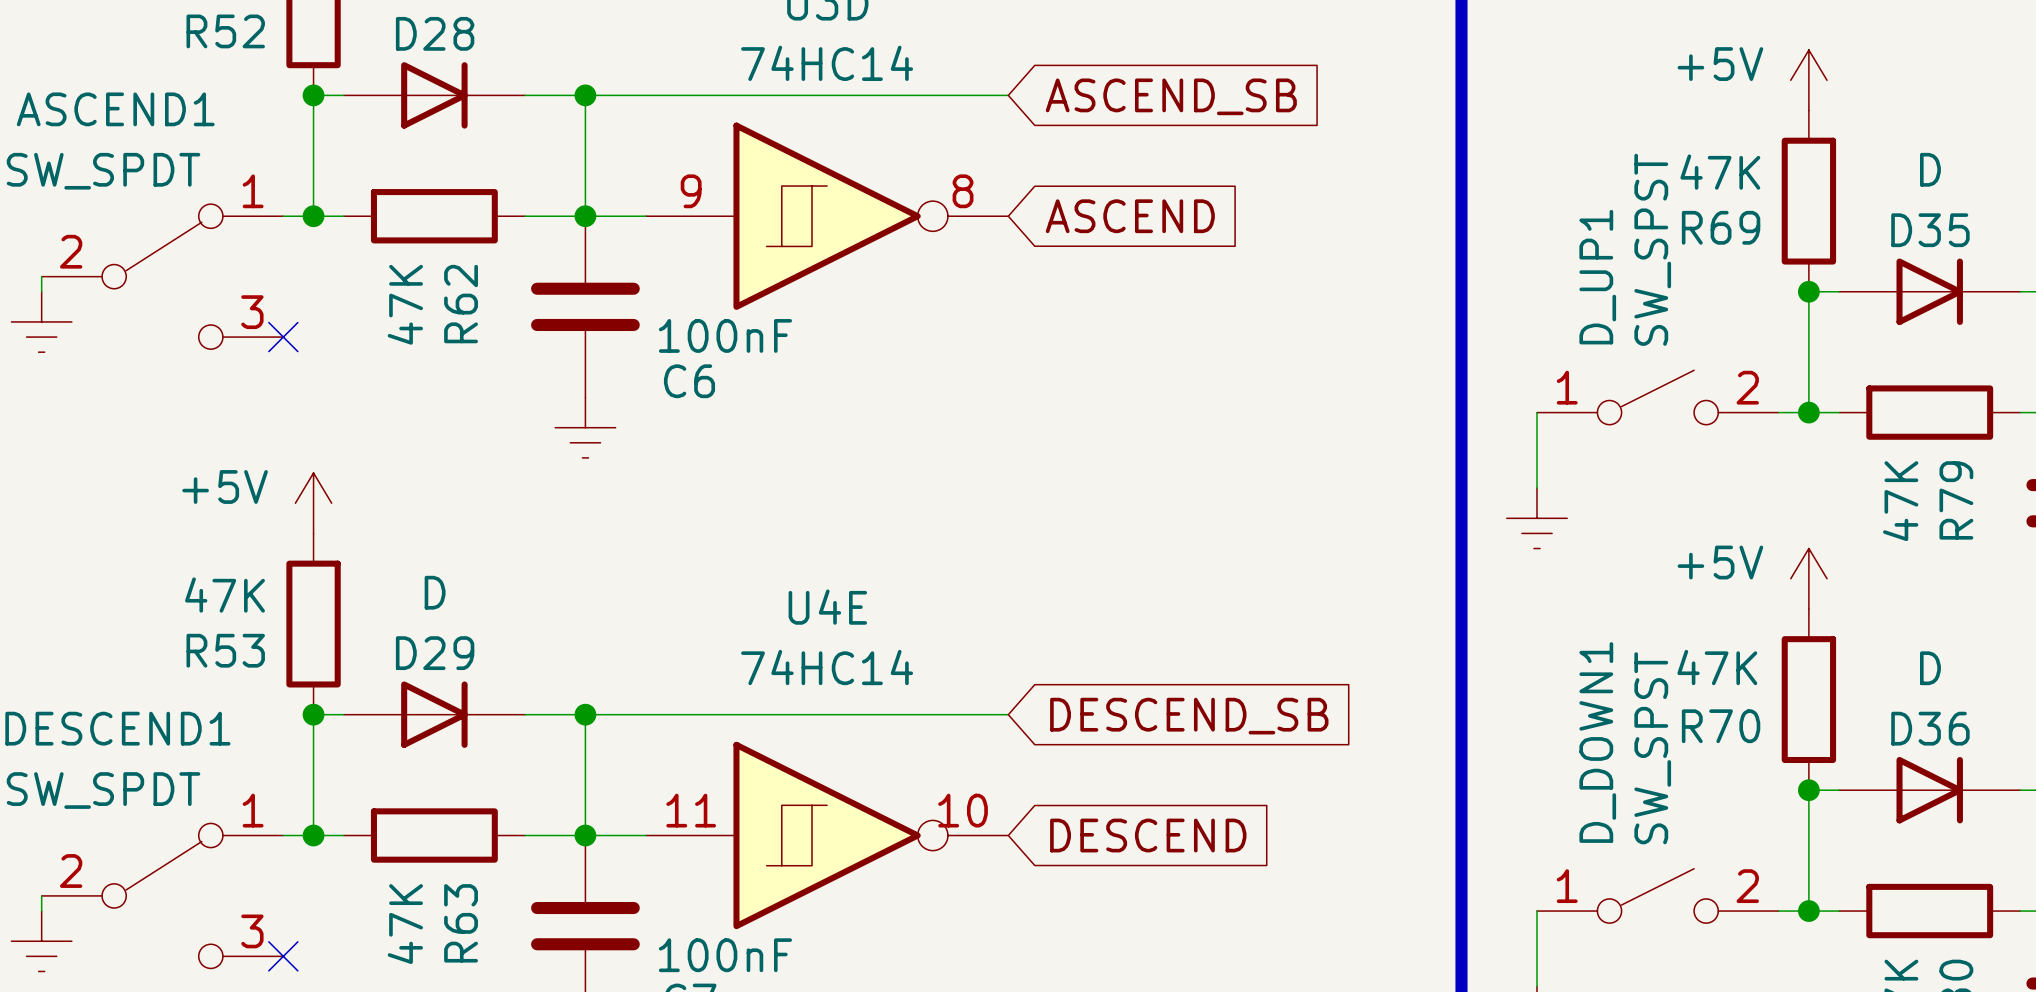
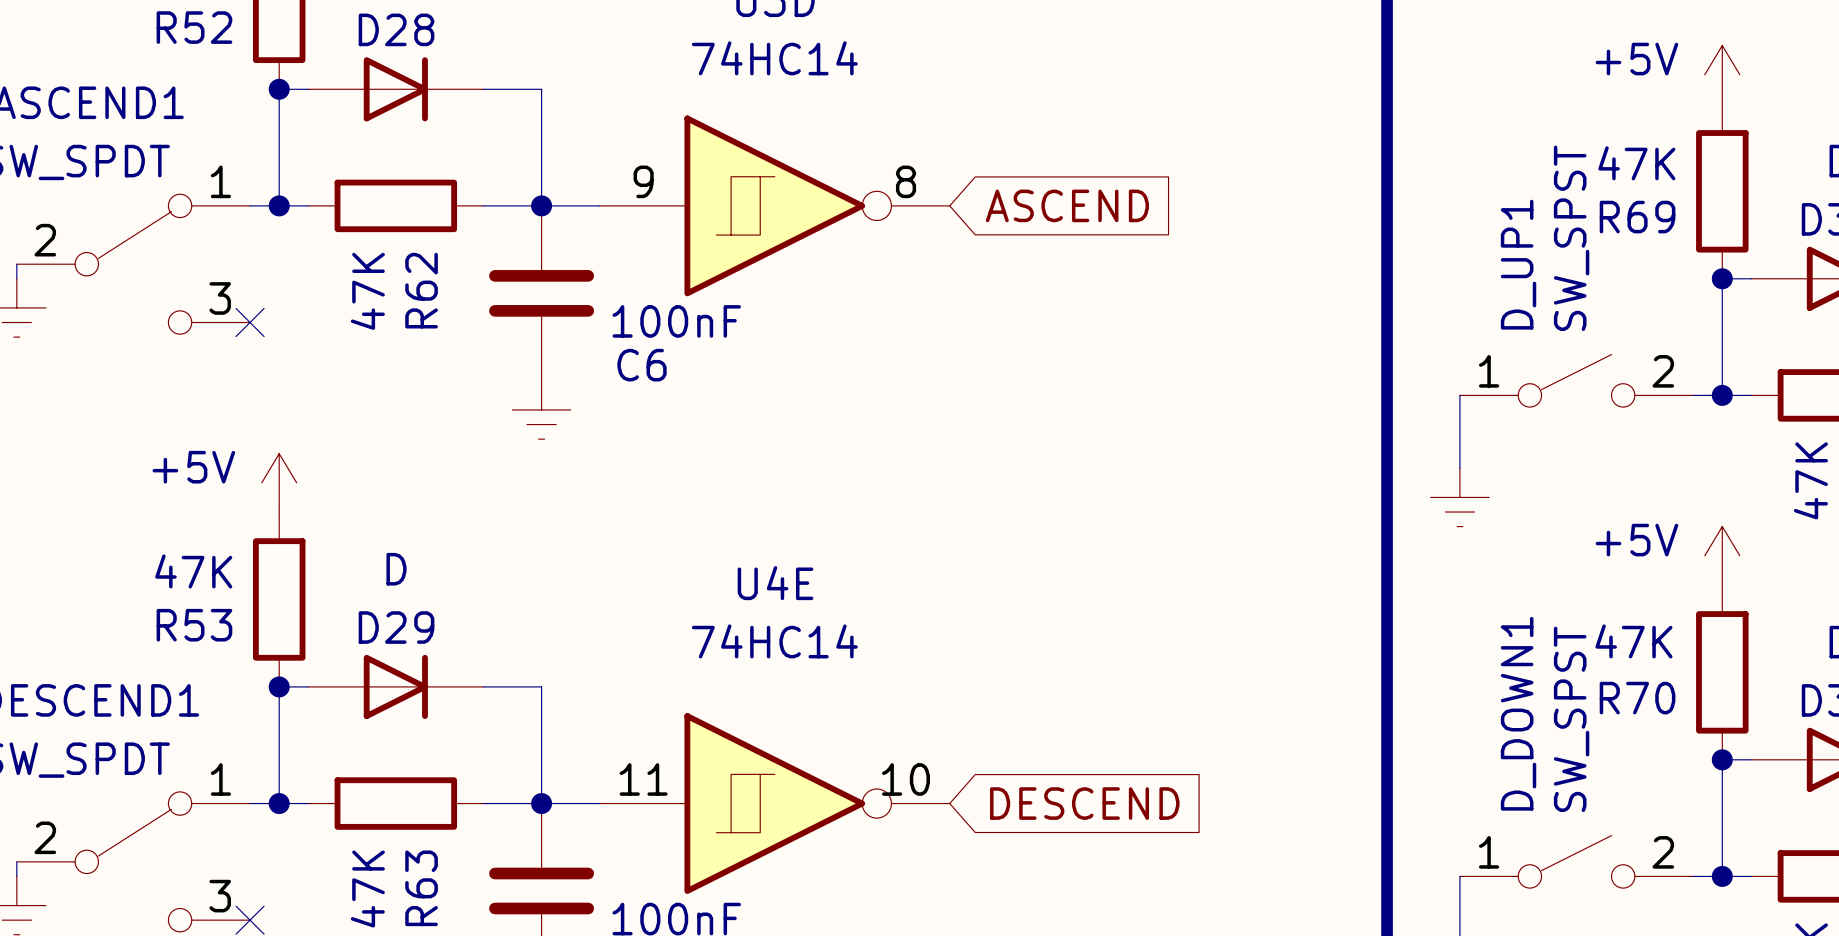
wire: (585, 95) (1008, 95) -> none
junction: (585, 95) -> none
global label: ASCEND_SB (1171, 96) -> none
wire: (585, 714) (1008, 714) -> none
junction: (585, 714) -> none
global label: DESCEND_SB (1189, 716) -> none

